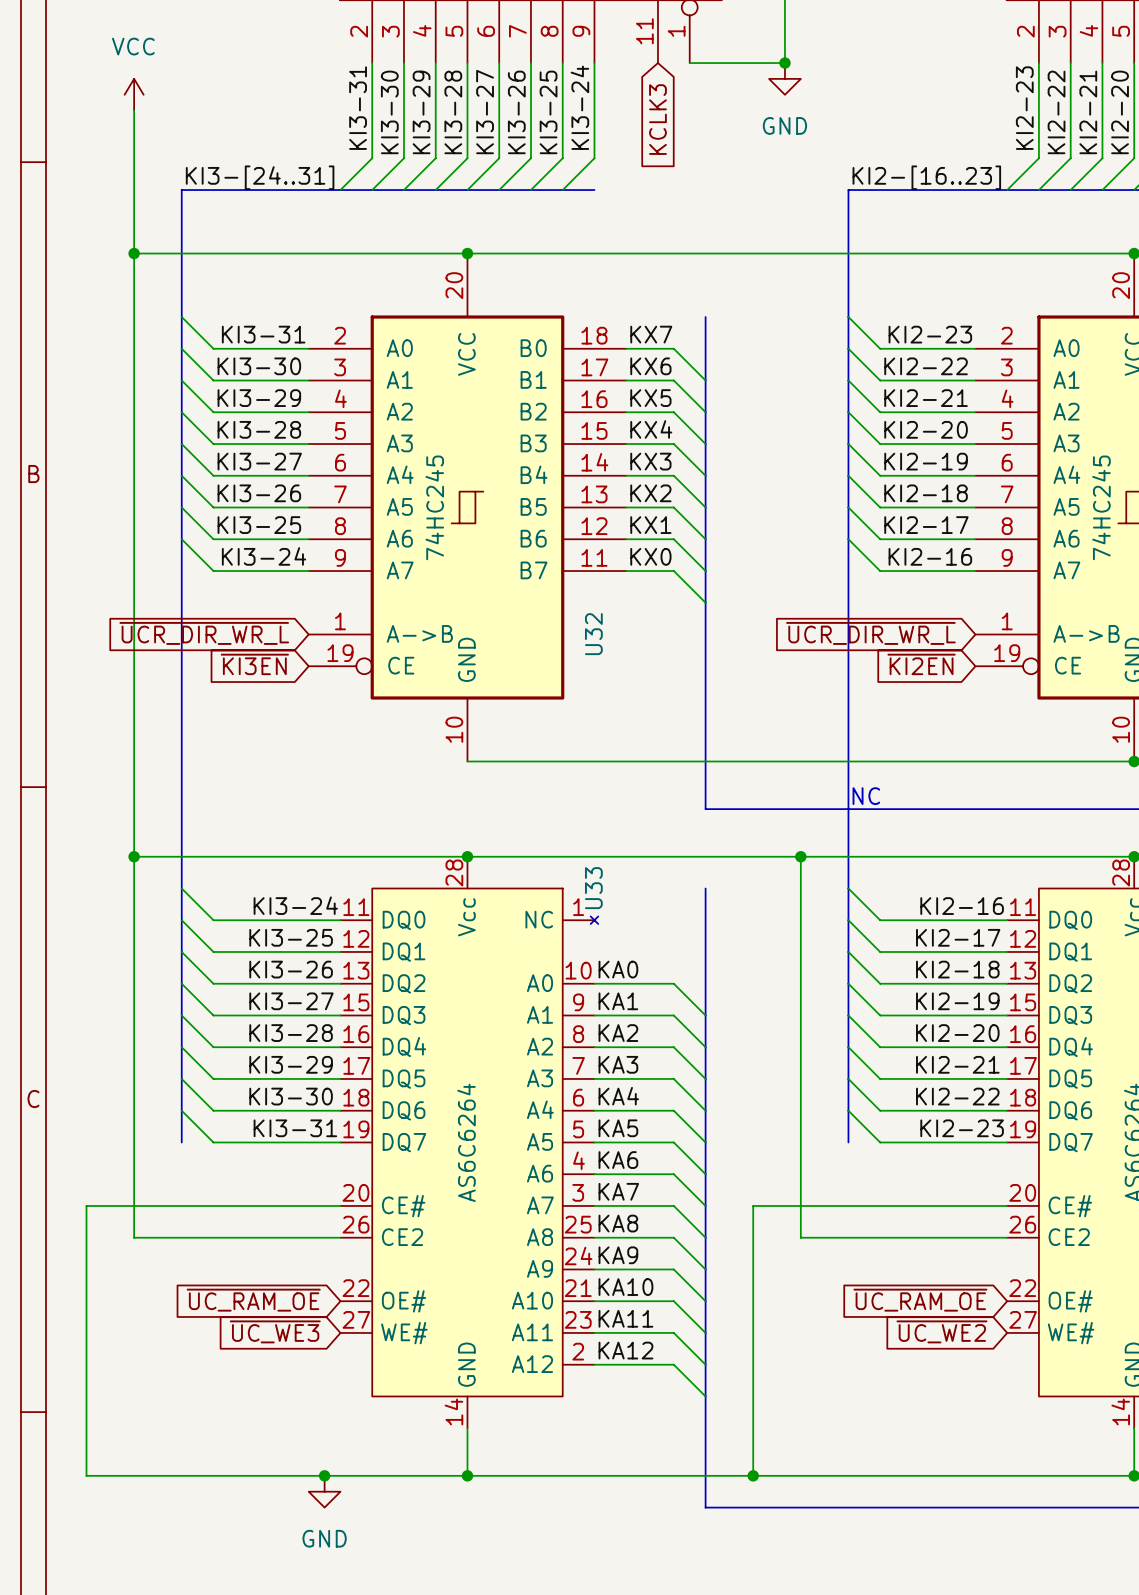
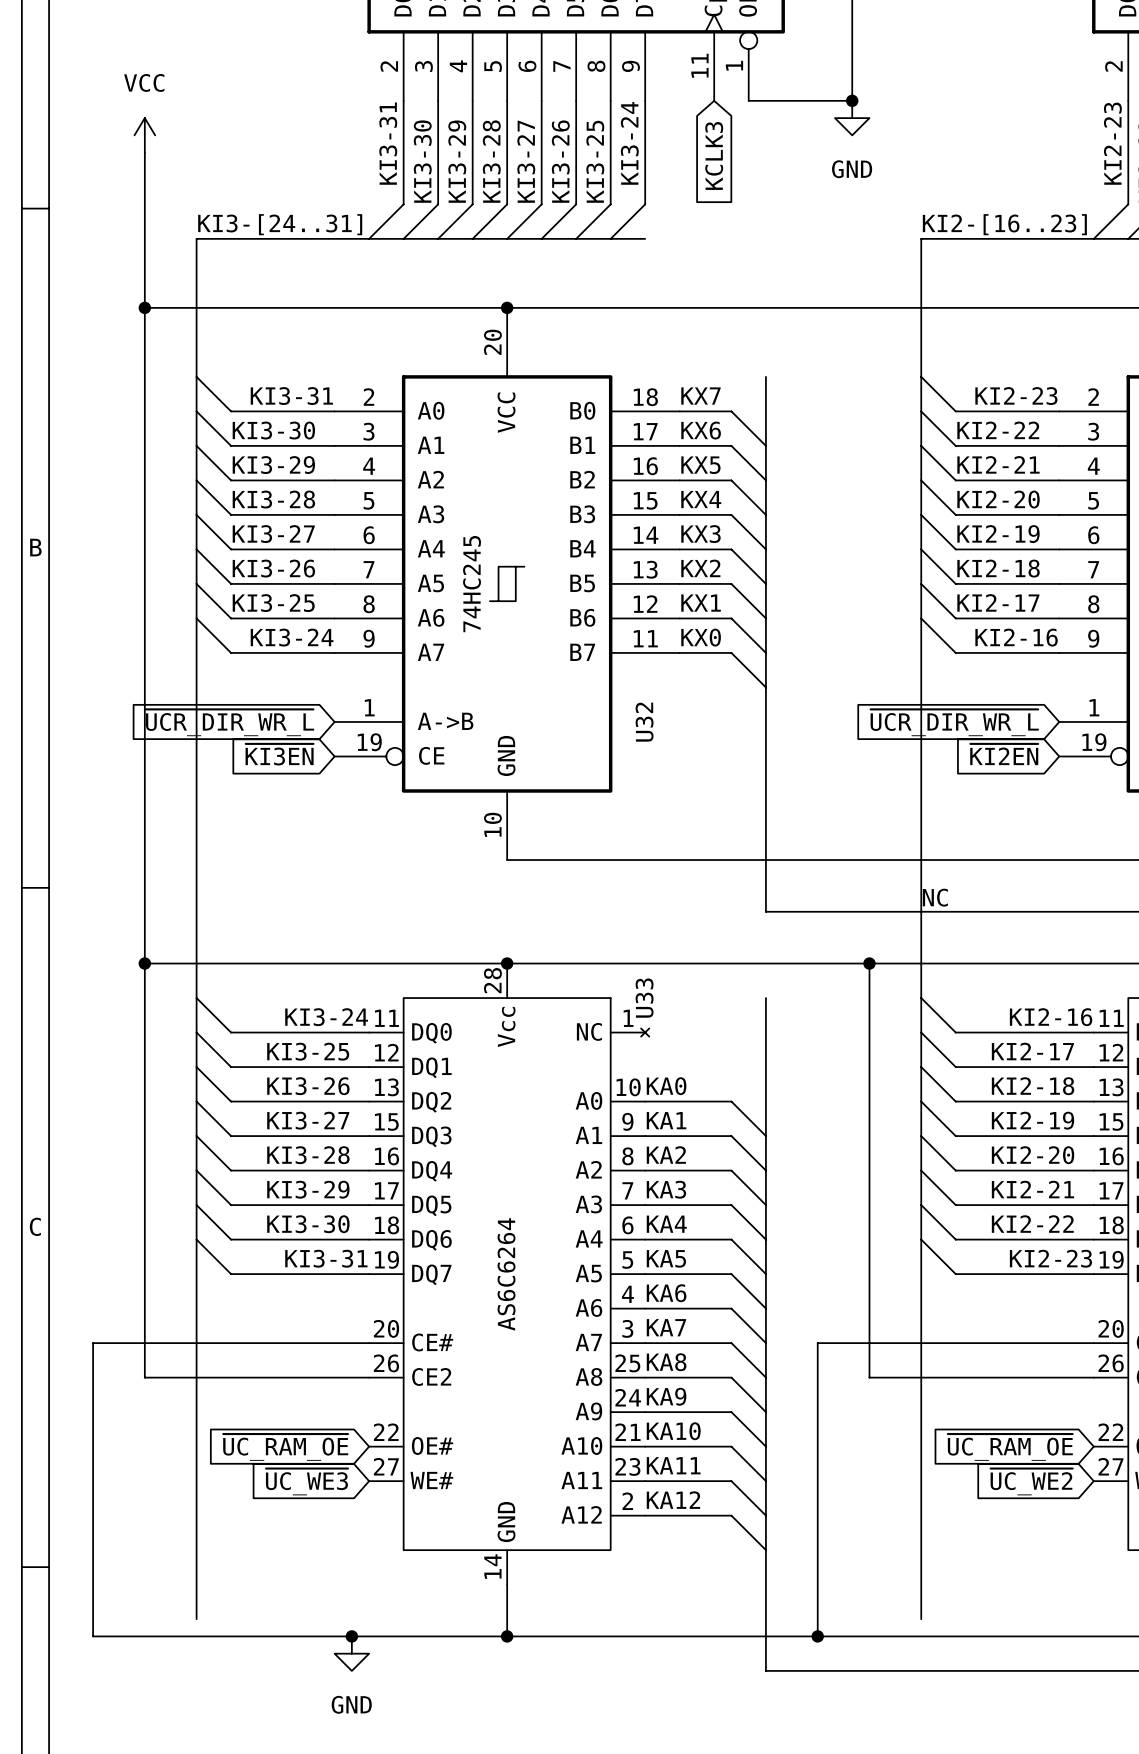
bus: none -> (196, 1274) (196, 1619)
bus: none -> (921, 1274) (921, 1619)

